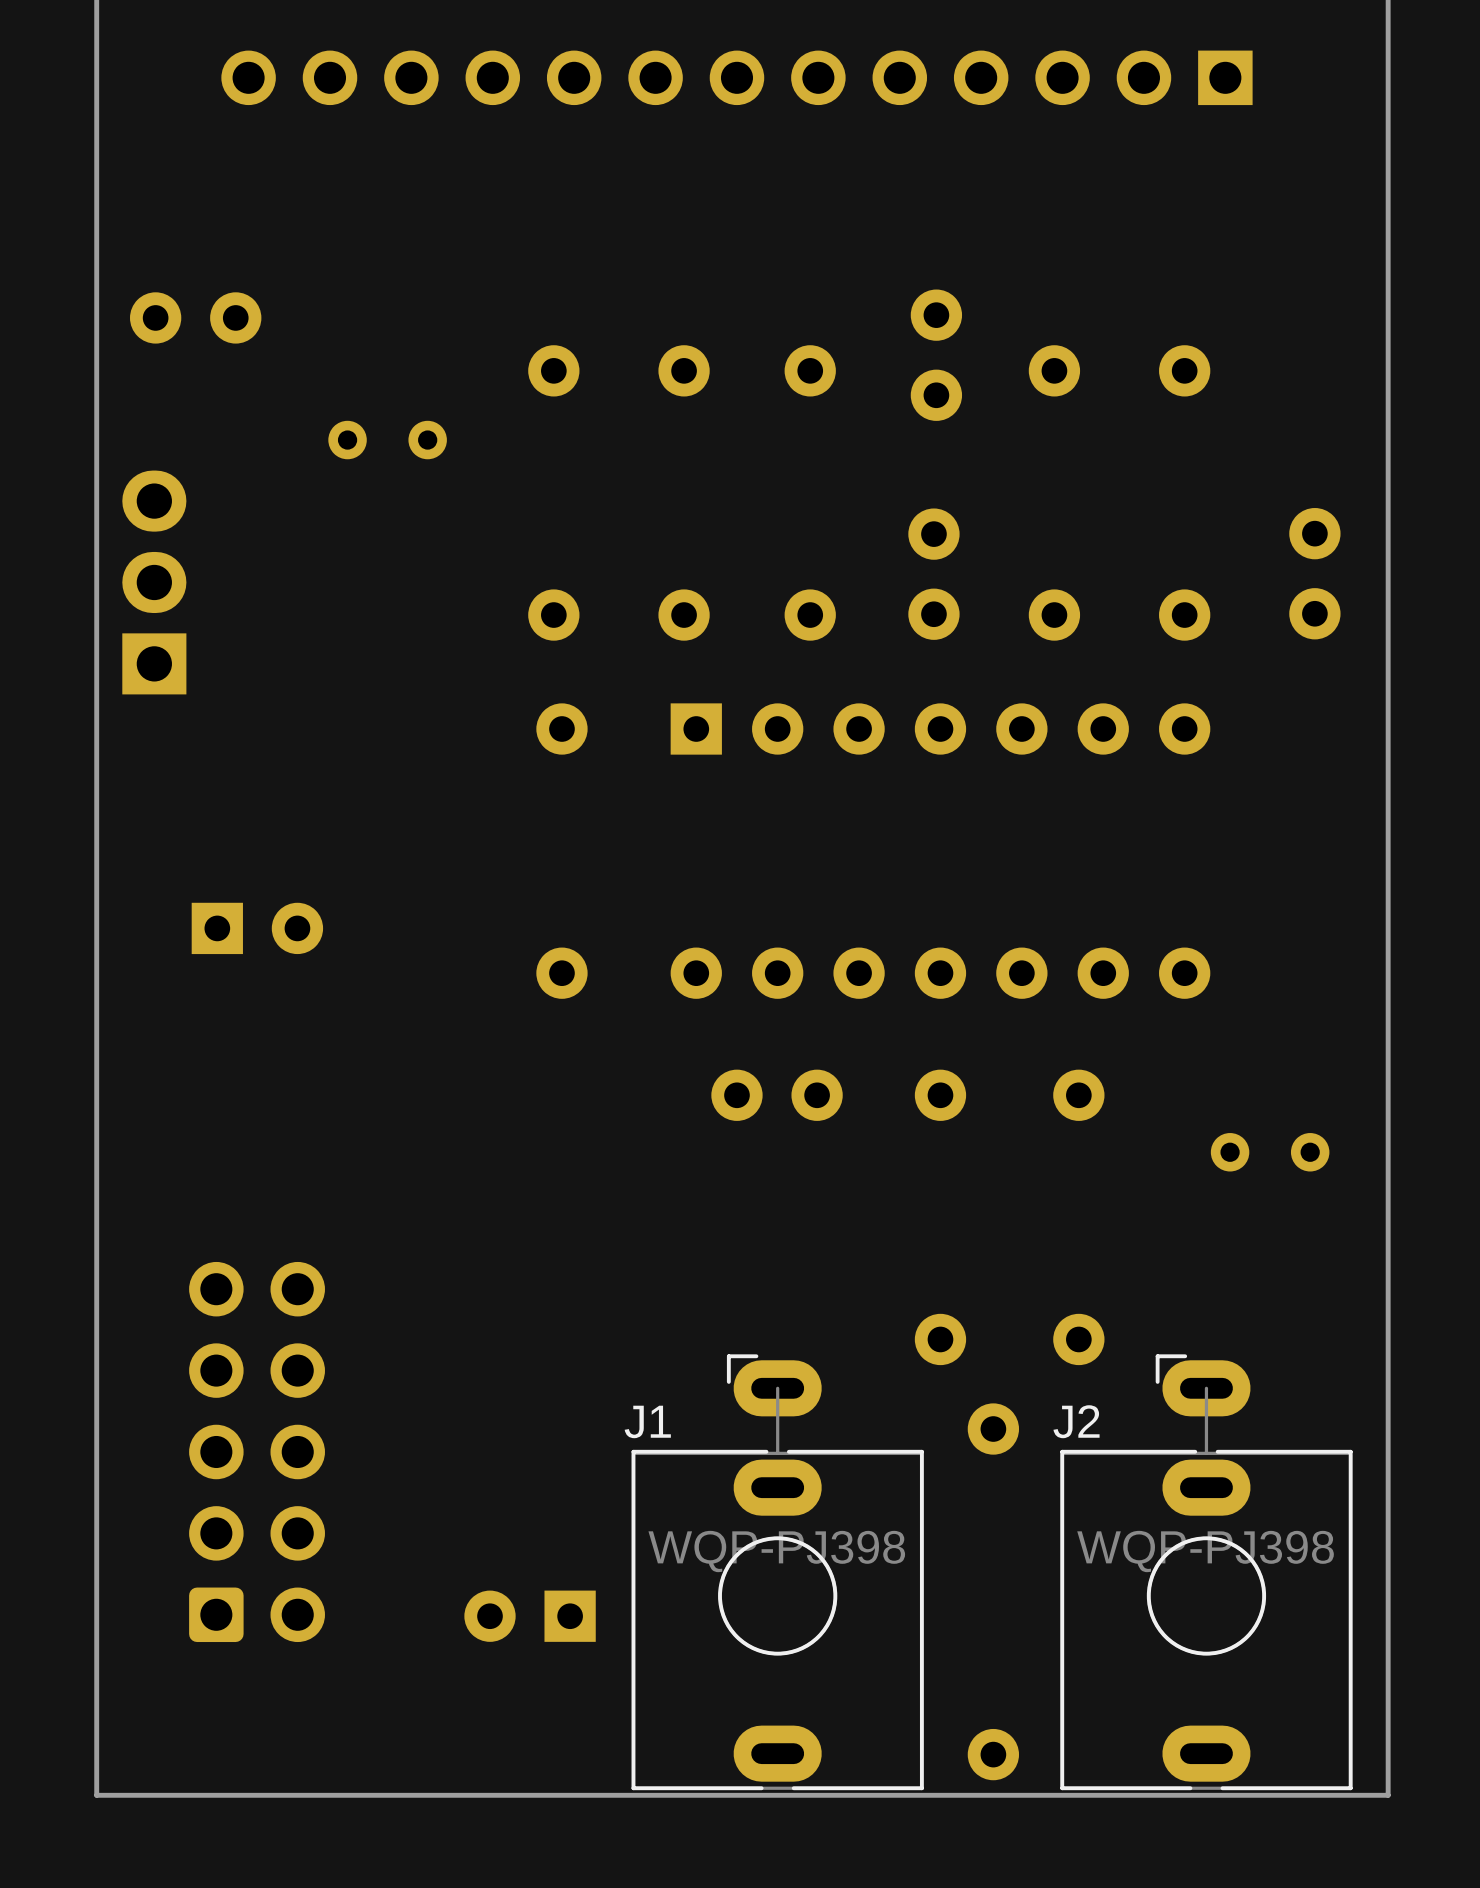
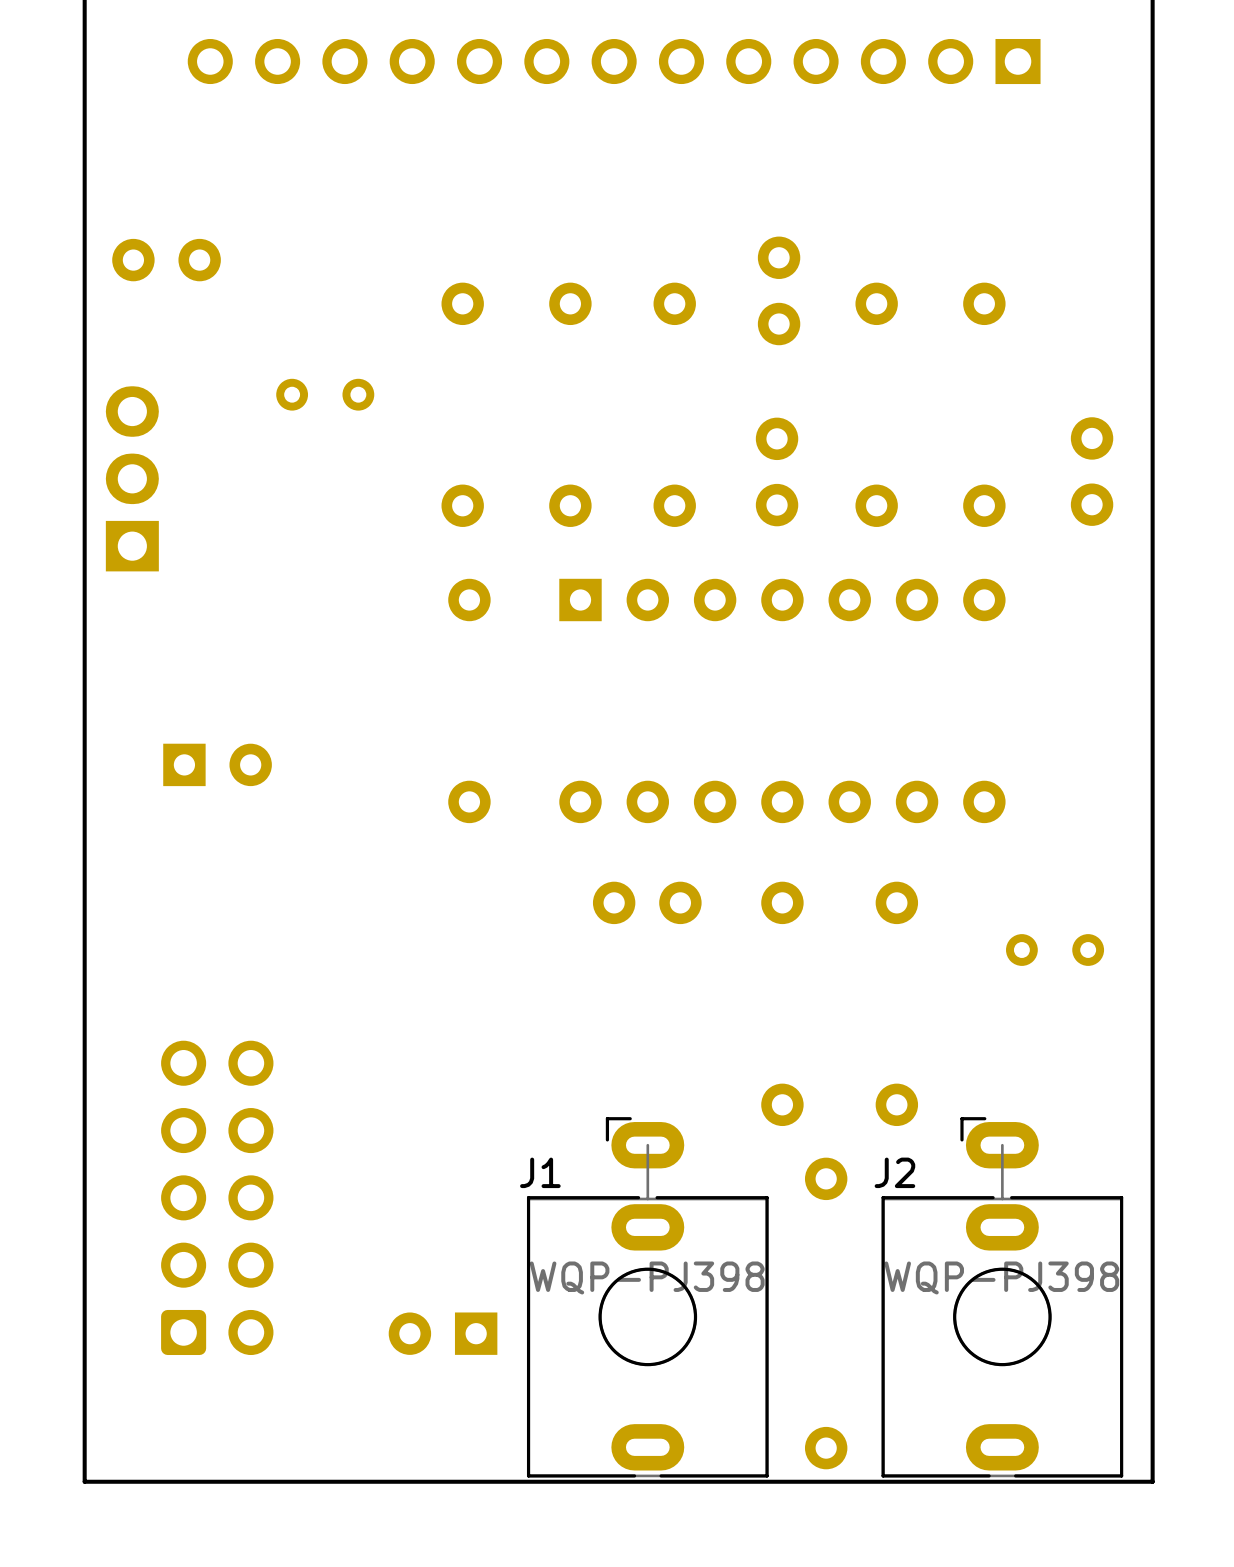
part position: (387, 440) -> (325, 394)

